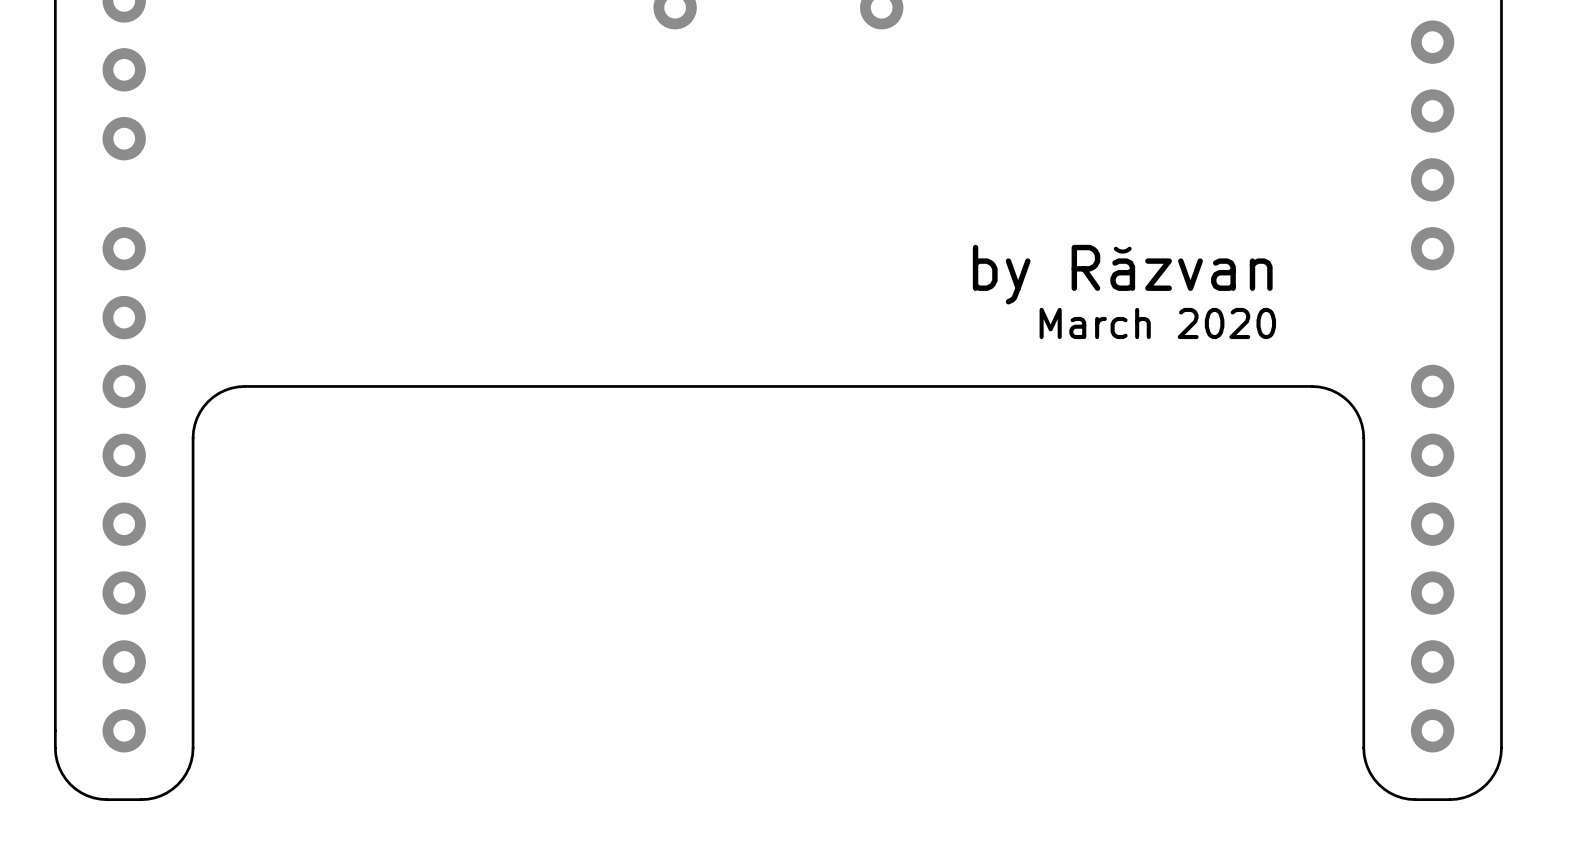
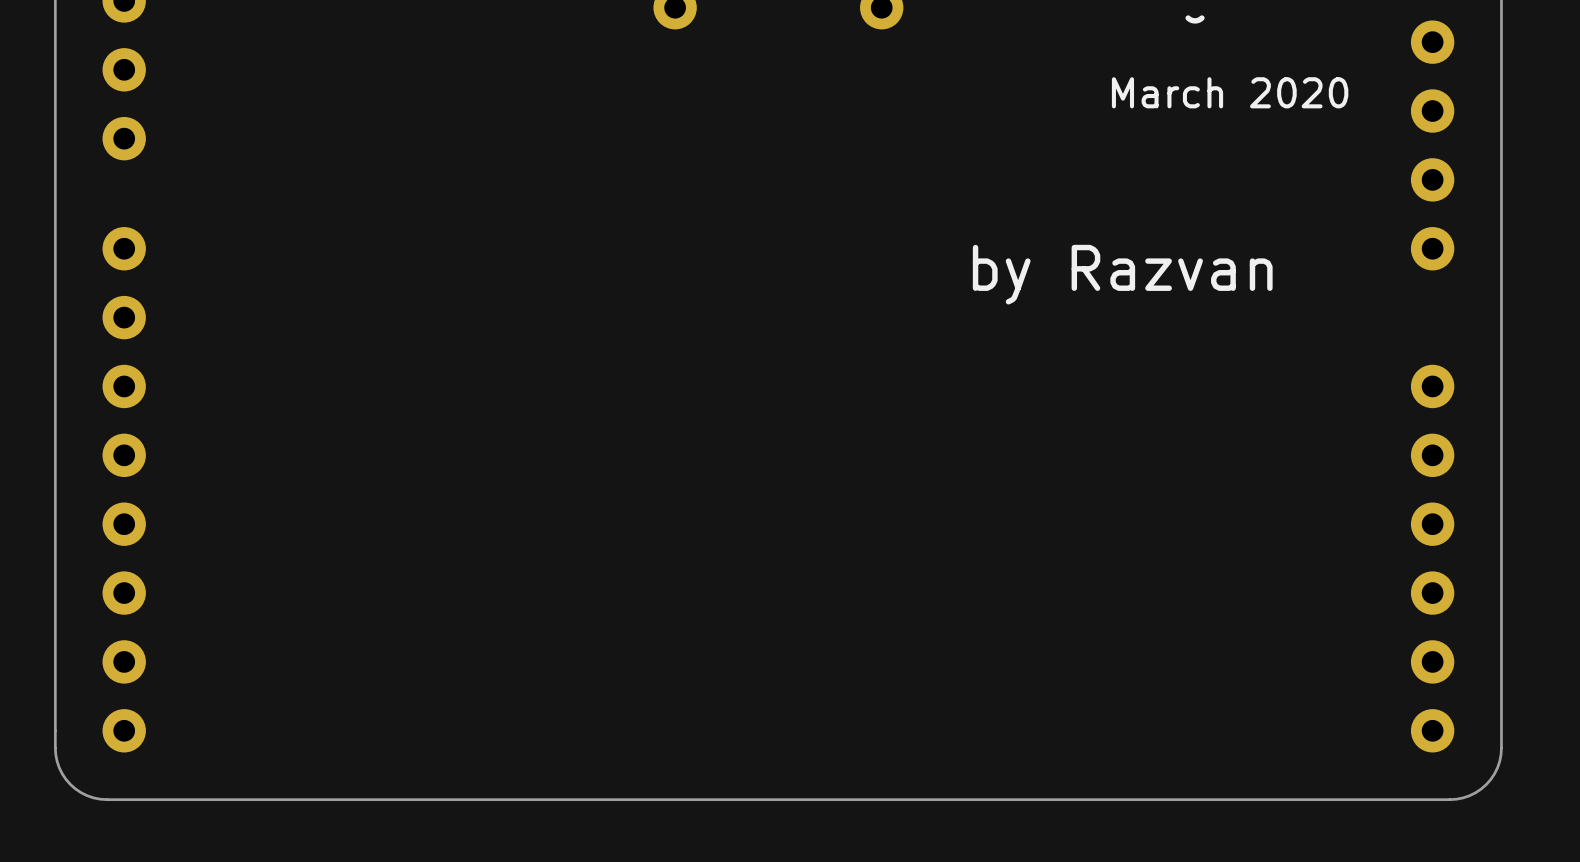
line: (1129, 248) (1122, 251) (1115, 248) -> (1201, 18) (1195, 20) (1188, 18)
text position: March 2020 (1157, 323) -> March 2020 (1230, 92)
board edge: (1415, 799) (1395, 795) (1383, 788) (1370, 773) (1365, 761) (1363, 748) (1363, 431) (1356, 412) (1343, 397) (1331, 390) (1312, 386) (244, 386) (224, 390) (213, 397) (203, 406) (197, 418) (193, 431) (193, 748) (191, 761) (186, 773) (172, 788) (161, 795) (141, 799) -> (1415, 799) (141, 799)

